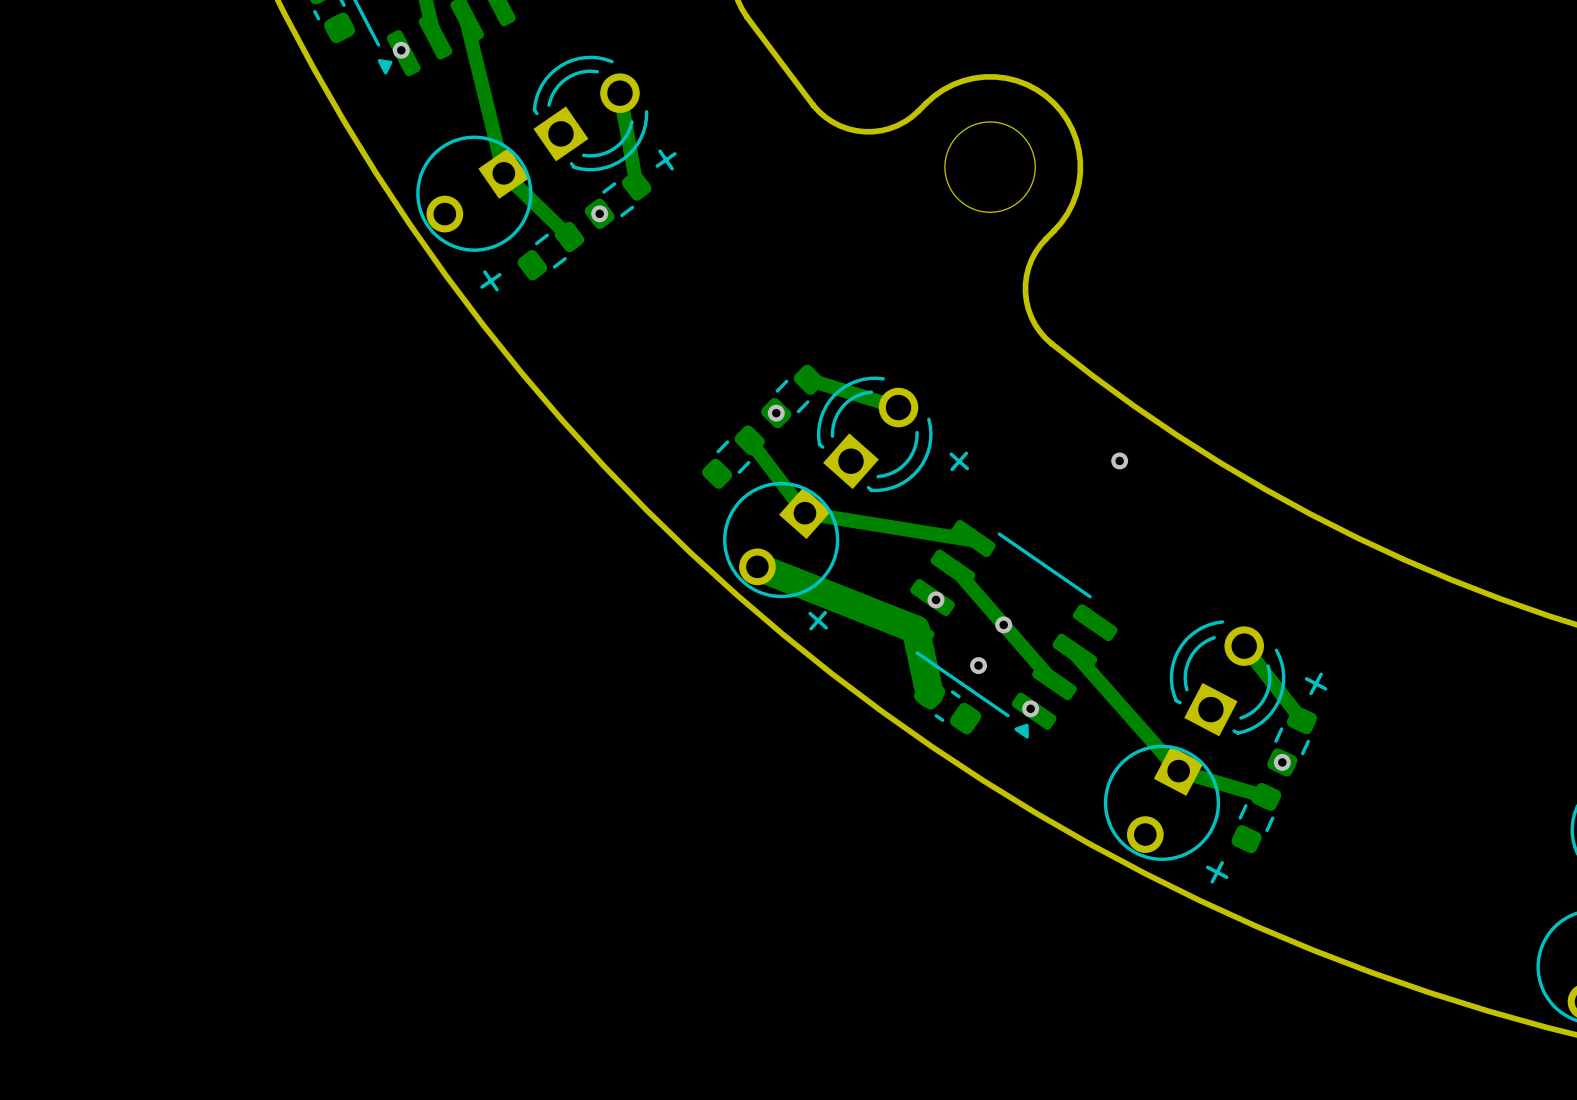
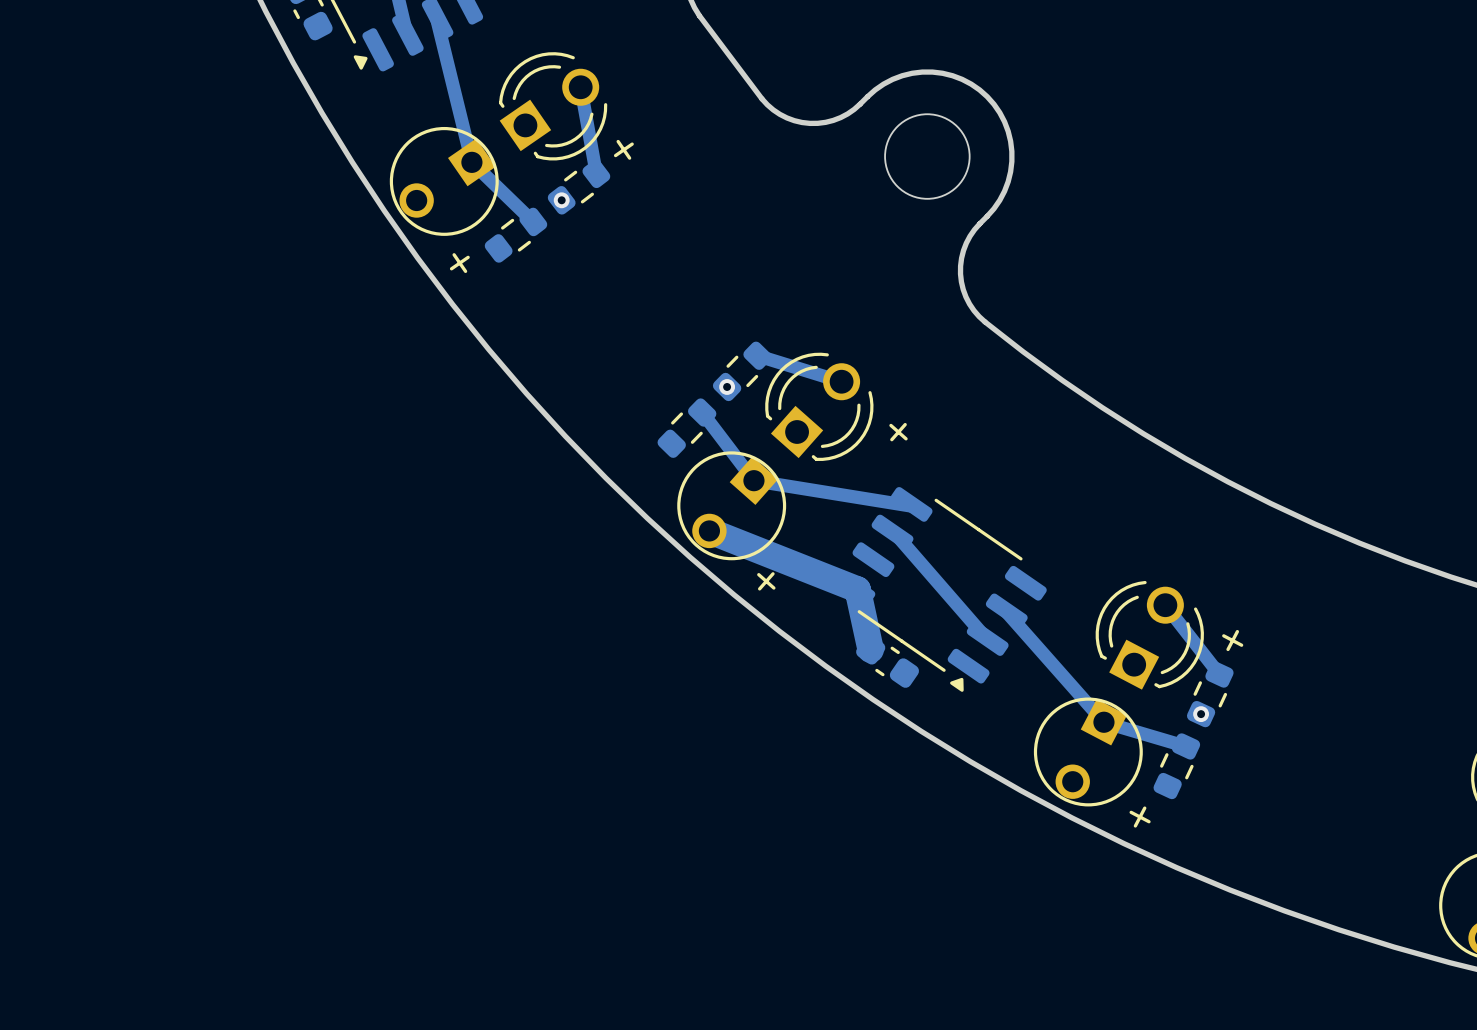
via: (401, 50) -> none
via: (1119, 460) -> none
via: (936, 599) -> none
via: (1003, 624) -> none
via: (978, 665) -> none
via: (1030, 708) -> none

